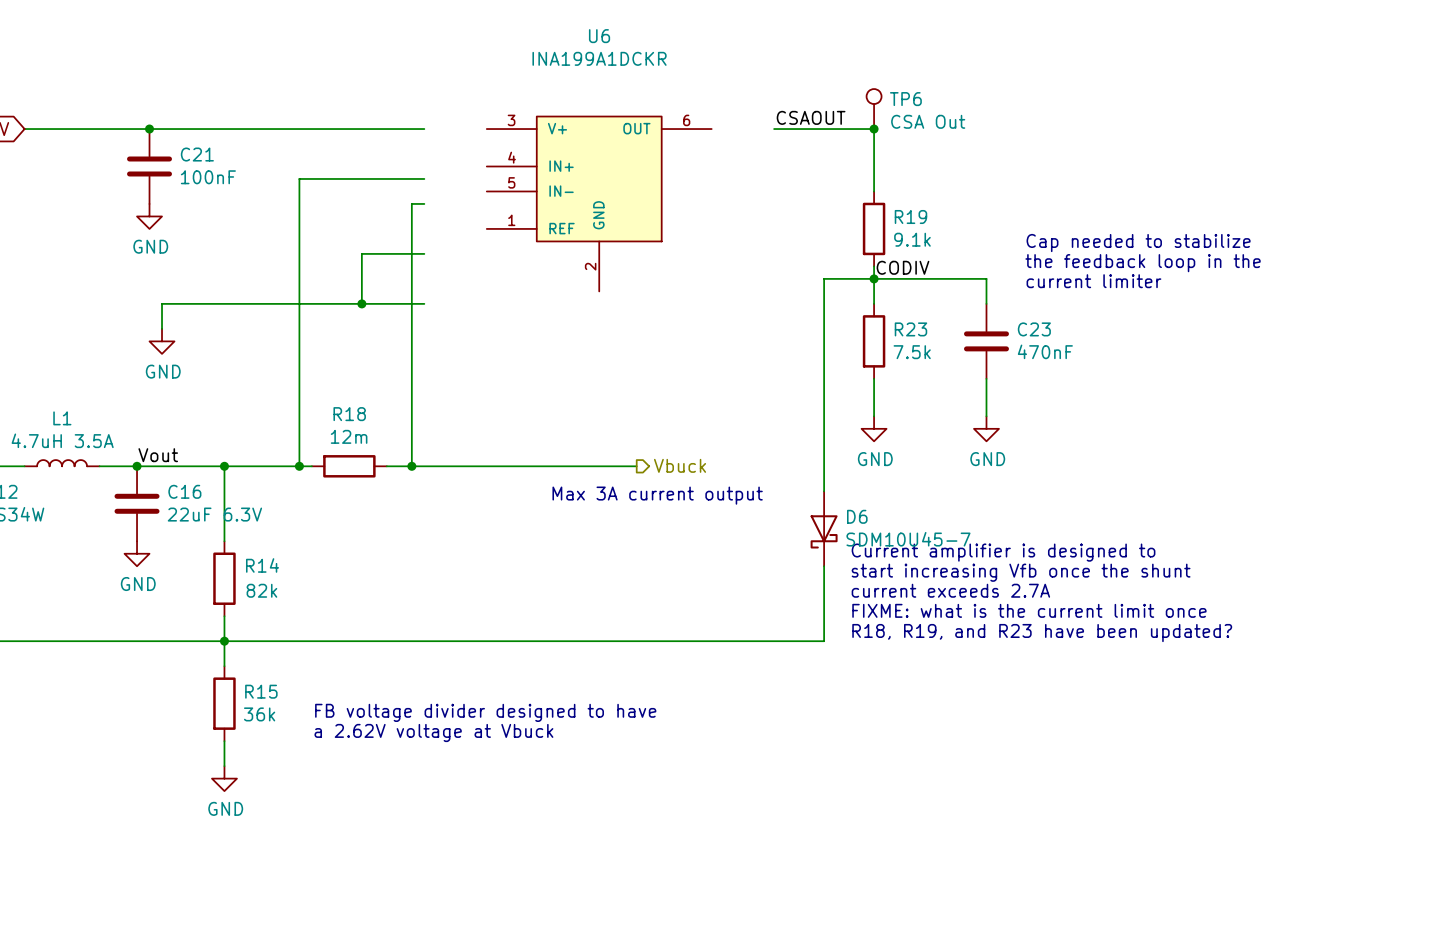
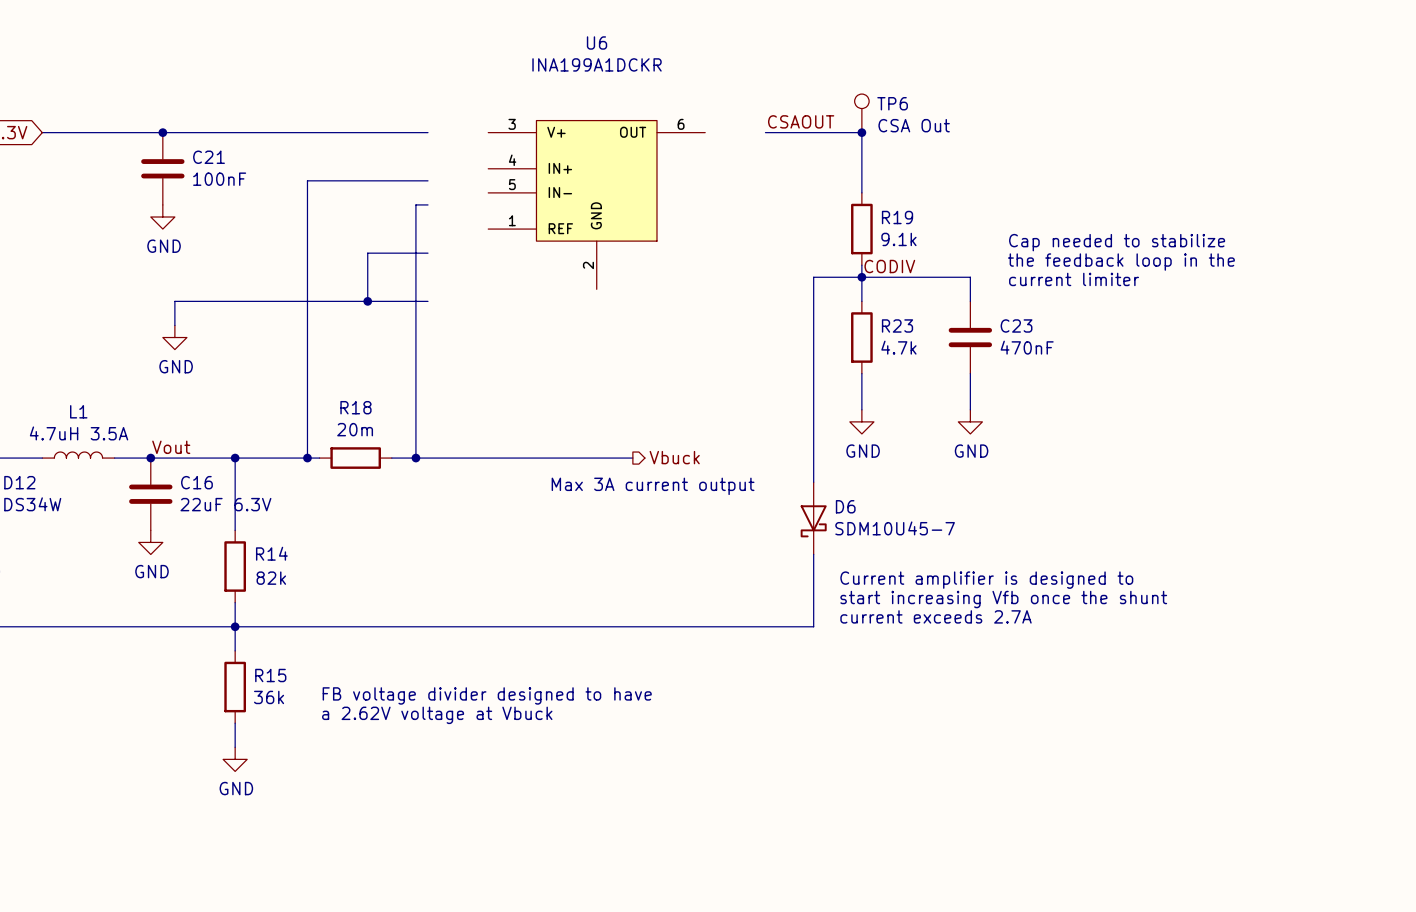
R23 value: 7.5k (912, 352) -> 4.7k (898, 347)
R18 value: 12m (349, 436) -> 20m (355, 429)
text: Current amplifier is designed to (1003, 552) -> none
text: start increasing Vfb once the shunt (1021, 572) -> none
text: current exceeds 2.7A (950, 590) -> Current amplifier is designed to (986, 580)
text: FIXME: what is the current limit once (1029, 610) -> start increasing Vfb once the shunt (1003, 599)
text: R18, R19, and R23 have been updated? (1042, 633) -> current exceeds 2.7A (936, 616)

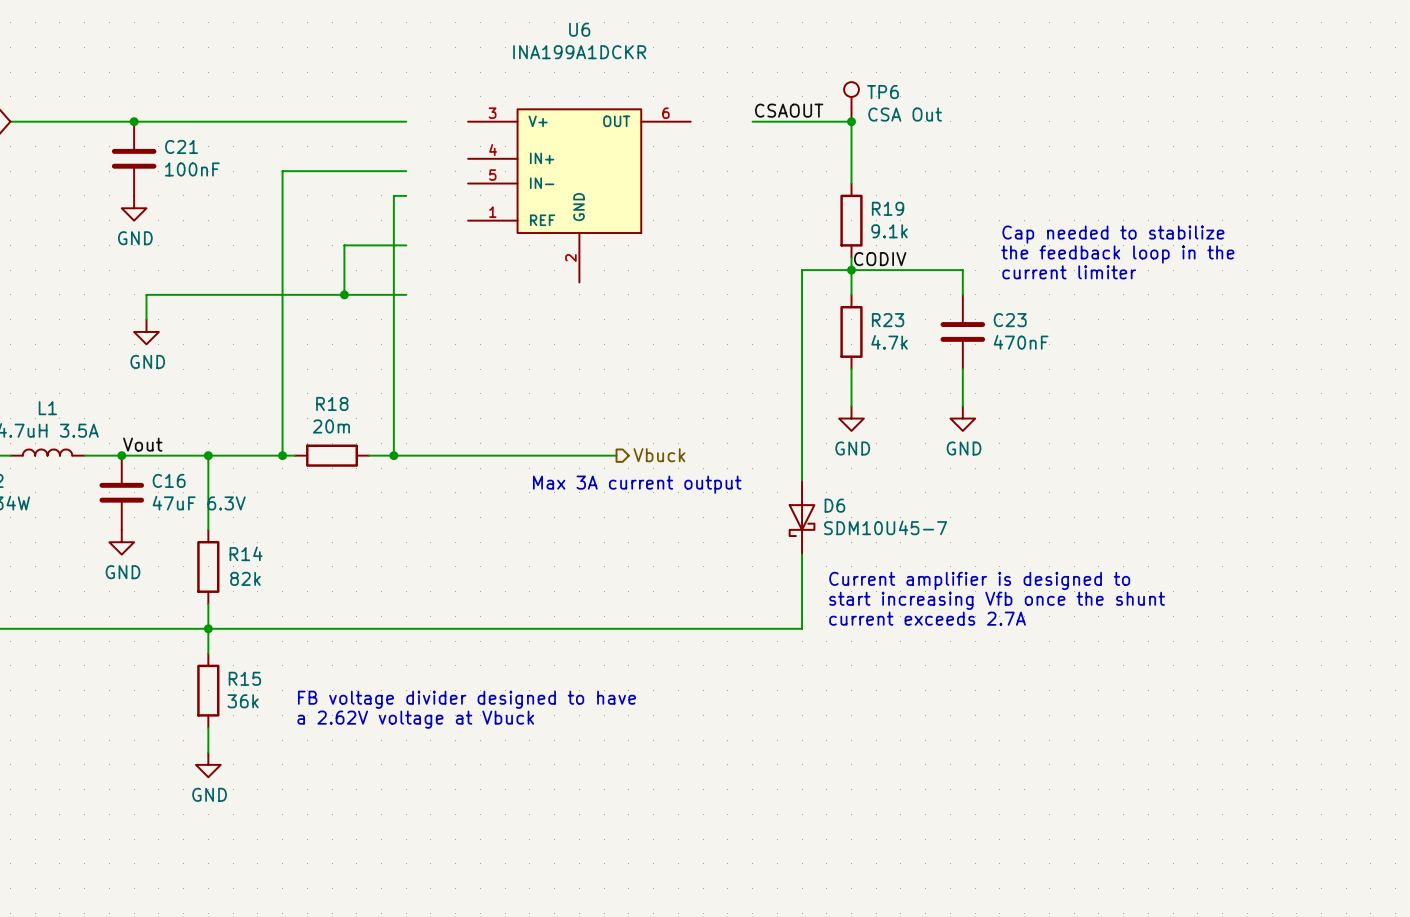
C16 value: 22uF 6.3V (225, 504) -> 47uF 6.3V (199, 503)

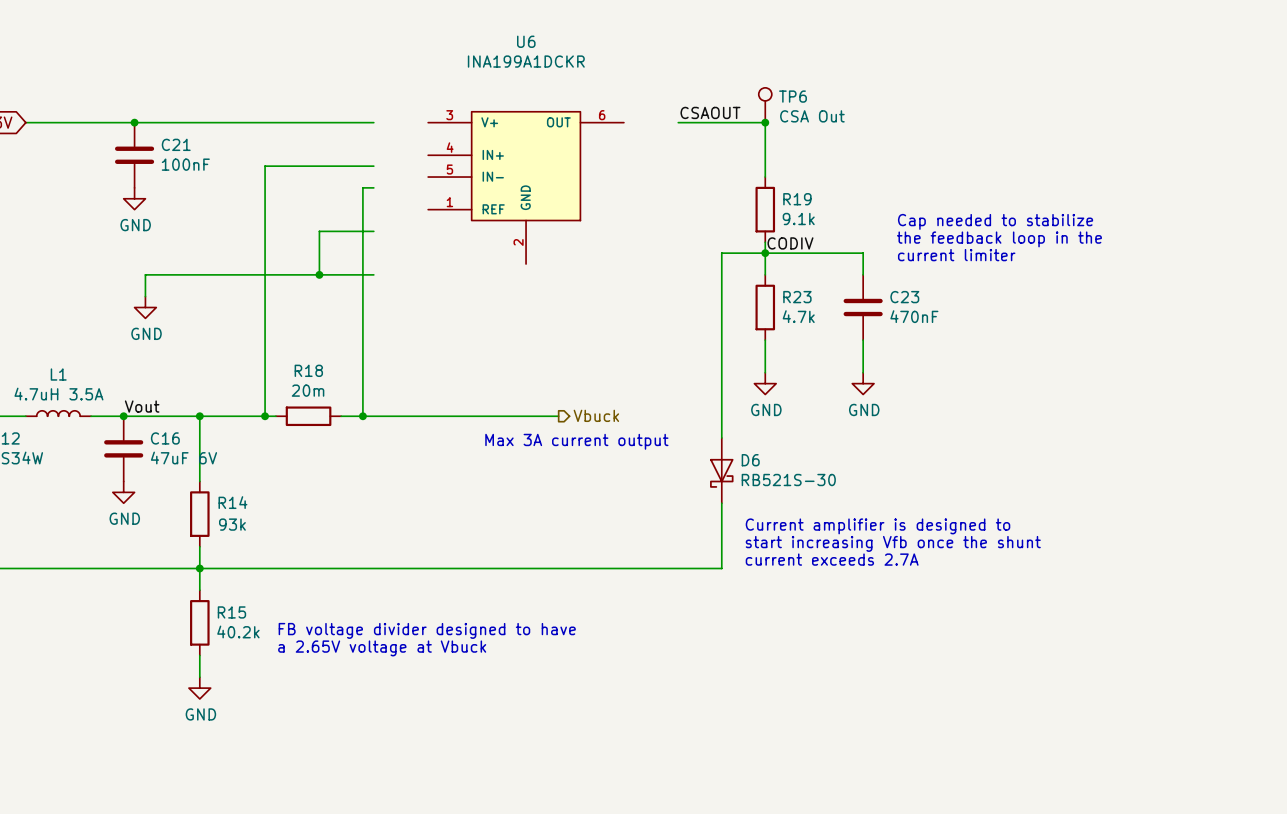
C16 value: 47uF 6.3V (199, 503) -> 47uF 6V (183, 458)
D6 value: SDM10U45-7 (885, 527) -> RB521S-30 (788, 480)
R14 value: 82k (245, 578) -> 93k (232, 524)
R15 value: 36k (243, 701) -> 40.2k (238, 631)
text: a 2.62V voltage at Vbuck (415, 719) -> a 2.65V voltage at Vbuck (382, 648)

